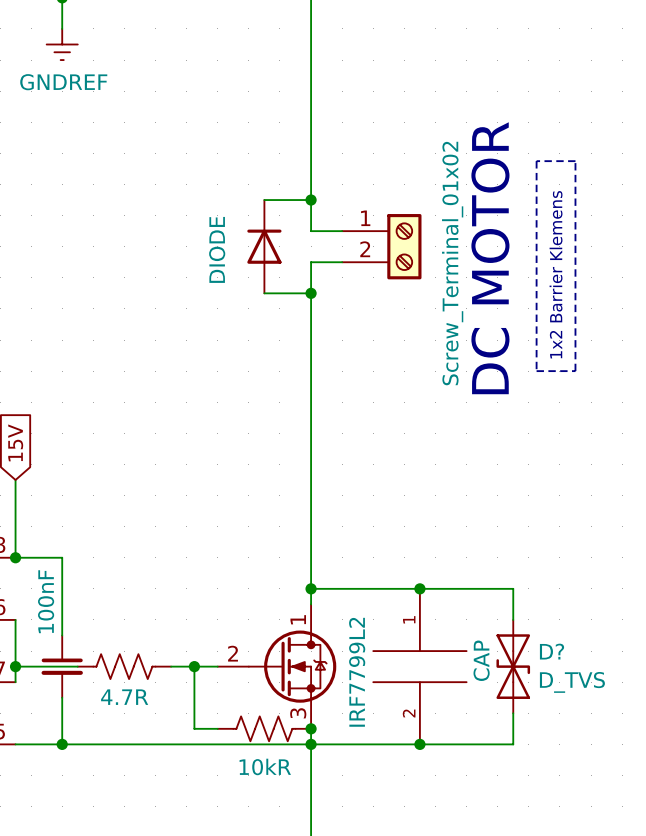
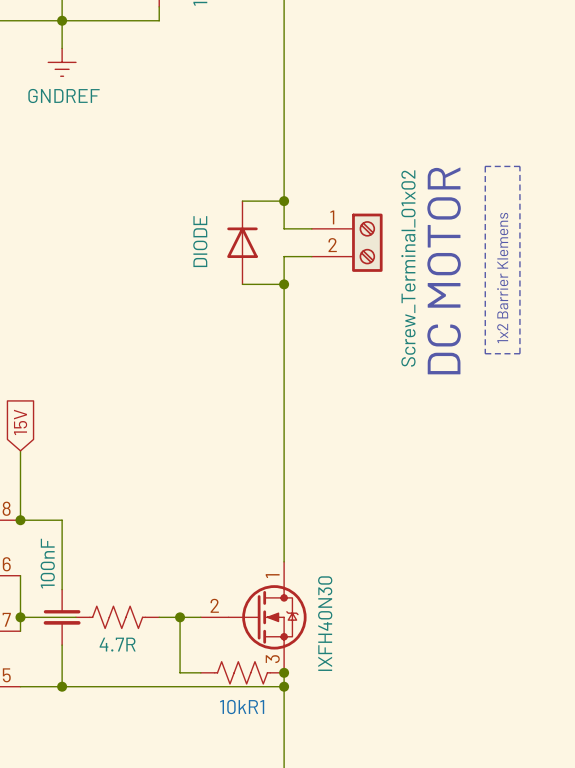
wire: (311, 588) (513, 588) (513, 619) -> none
junction: (311, 588) -> none
junction: (419, 588) -> none
part: CAP (419, 666) -> none
D?: D_TVS (513, 666) -> none
part value: IRF7799L2 (357, 672) -> IXFH40N30 (325, 623)
wire: (513, 713) (513, 744) (311, 744) -> none
junction: (419, 744) -> none
10kR name: 10kR (265, 766) -> 10kR1 (242, 707)

